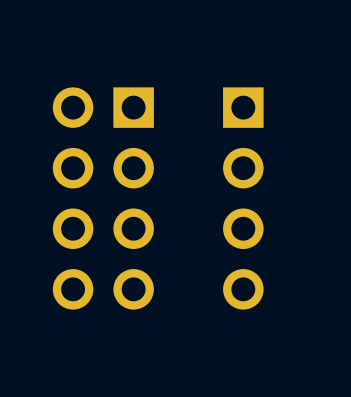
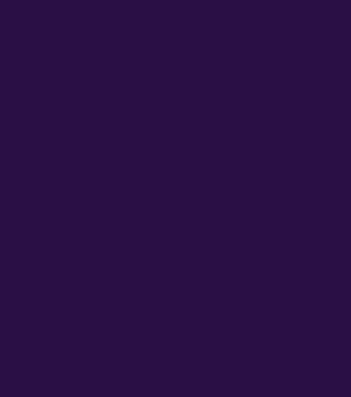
part: (103, 198) -> none
part: (243, 198) -> none

